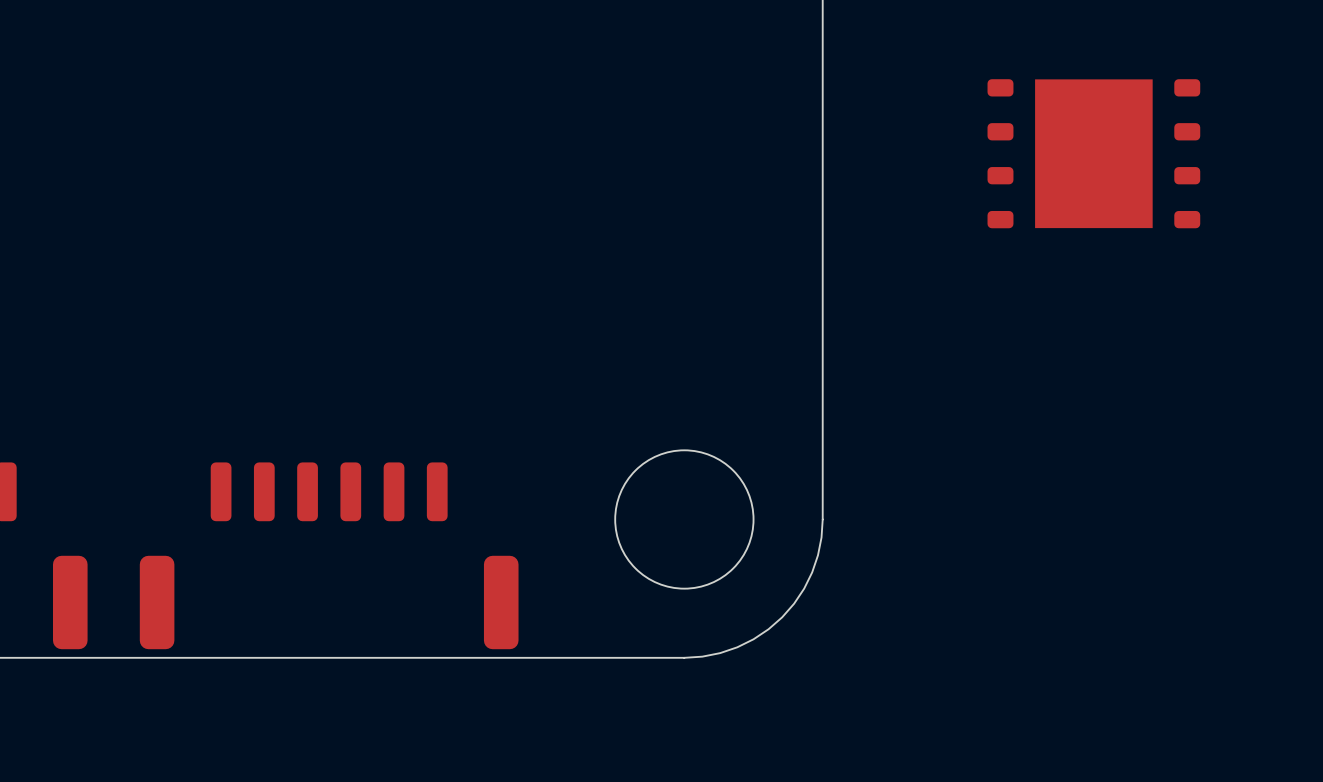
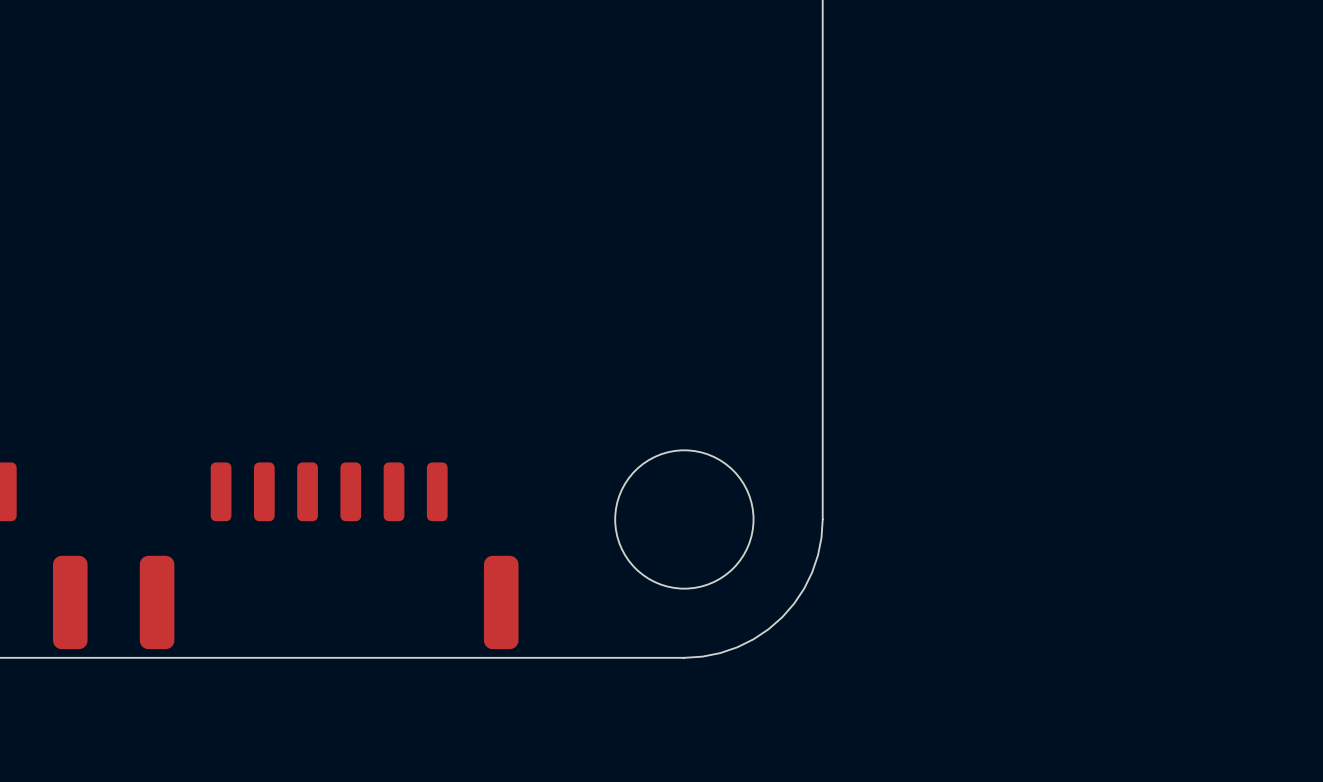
part: (1093, 153) -> none

